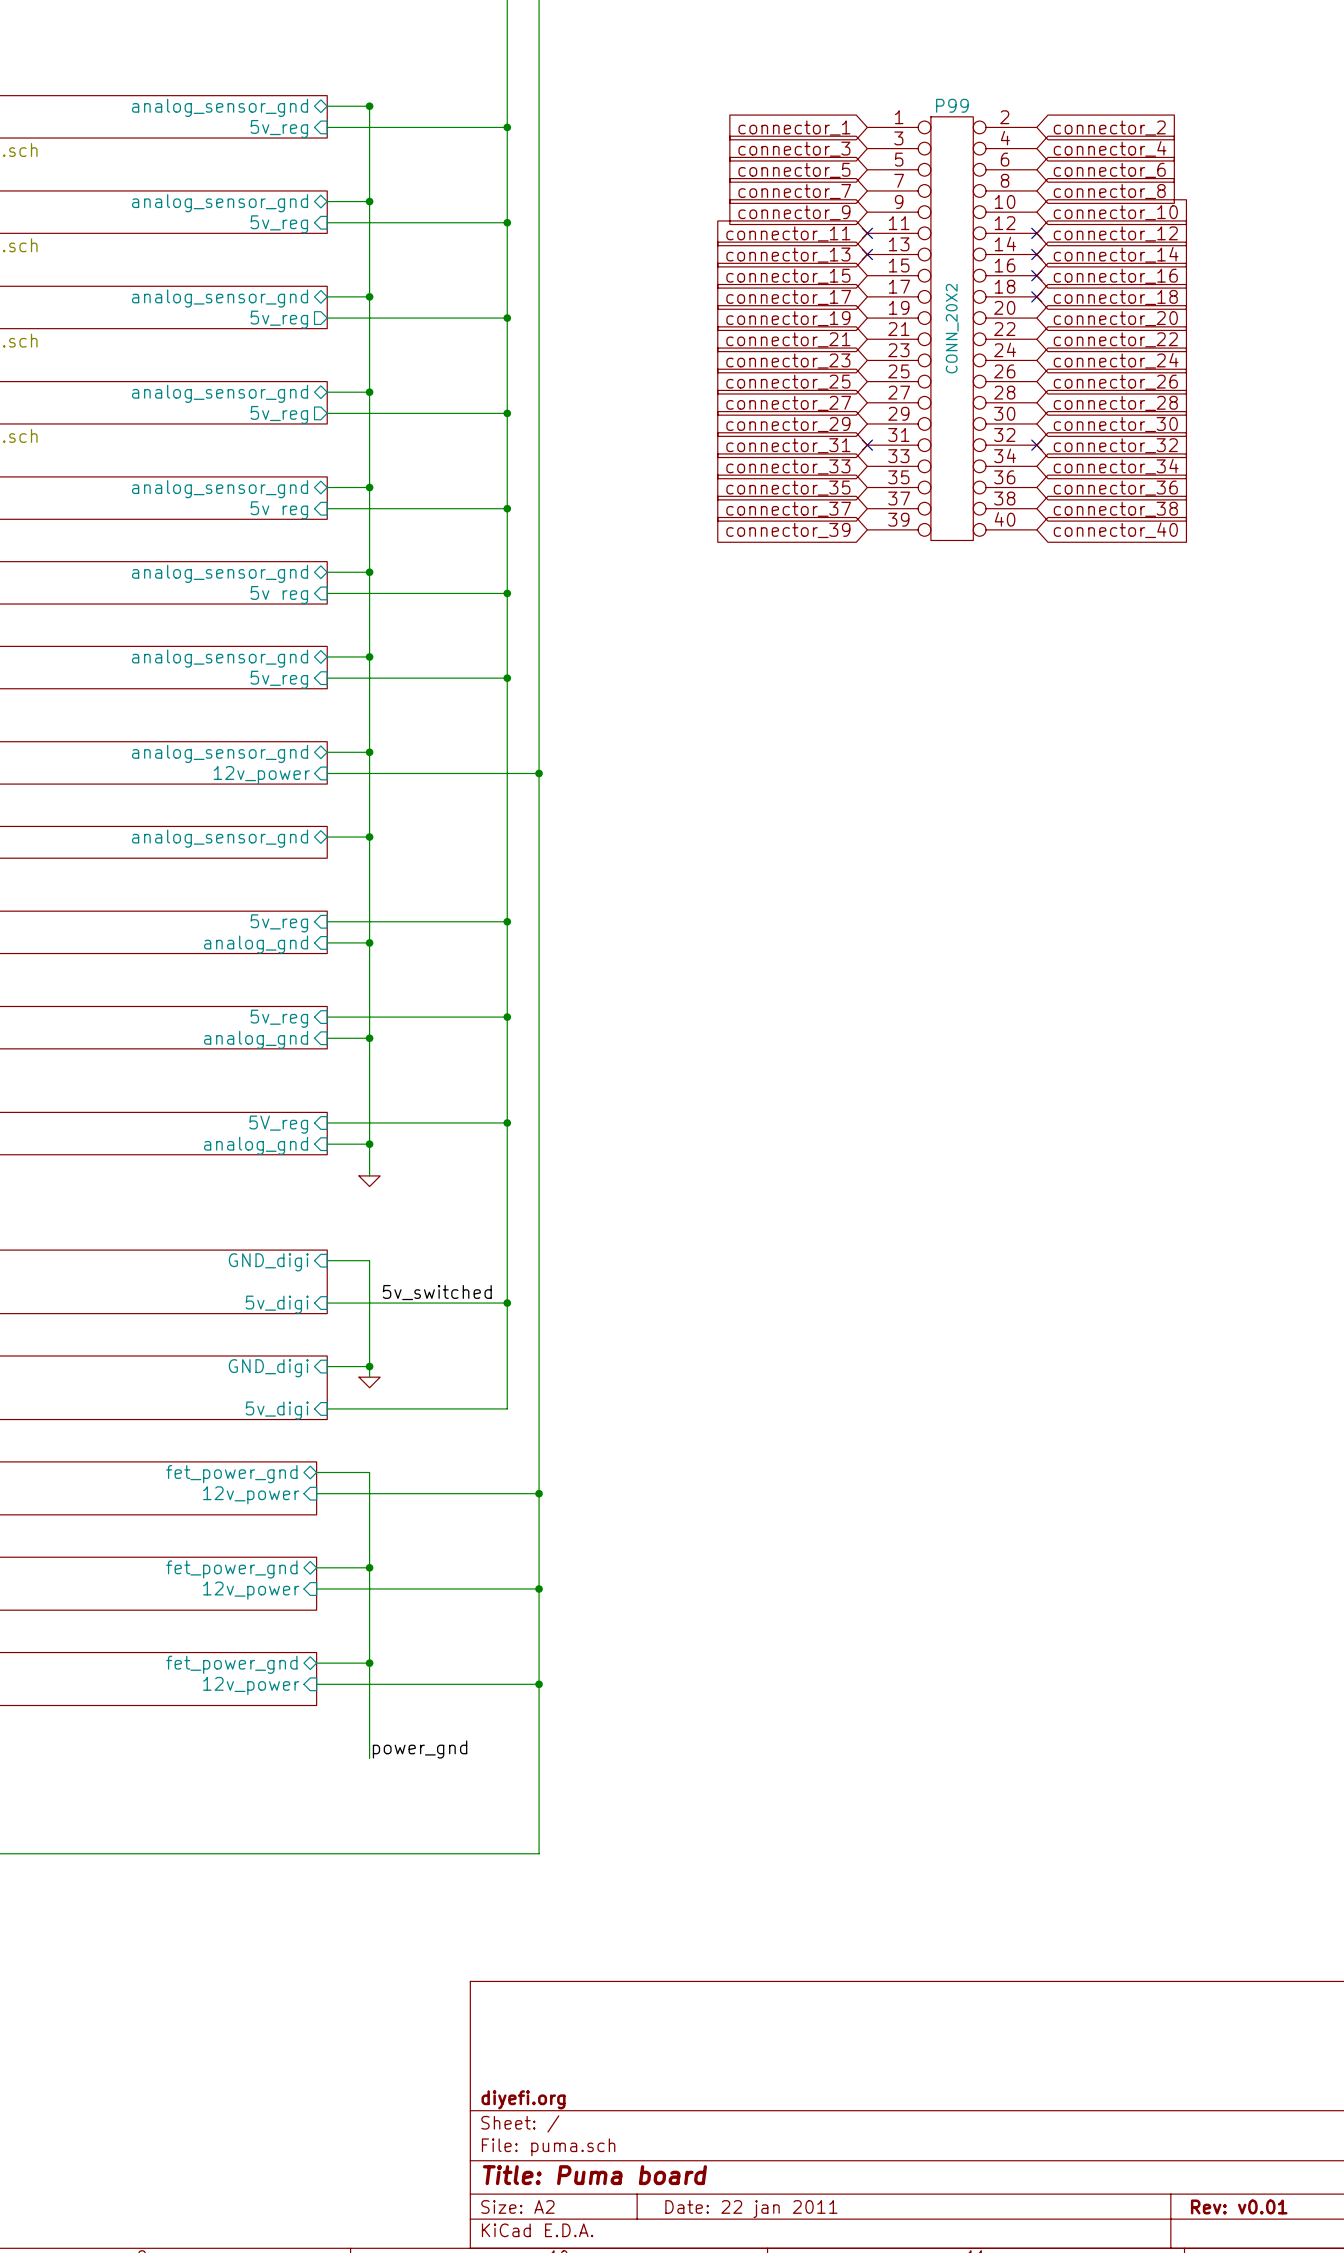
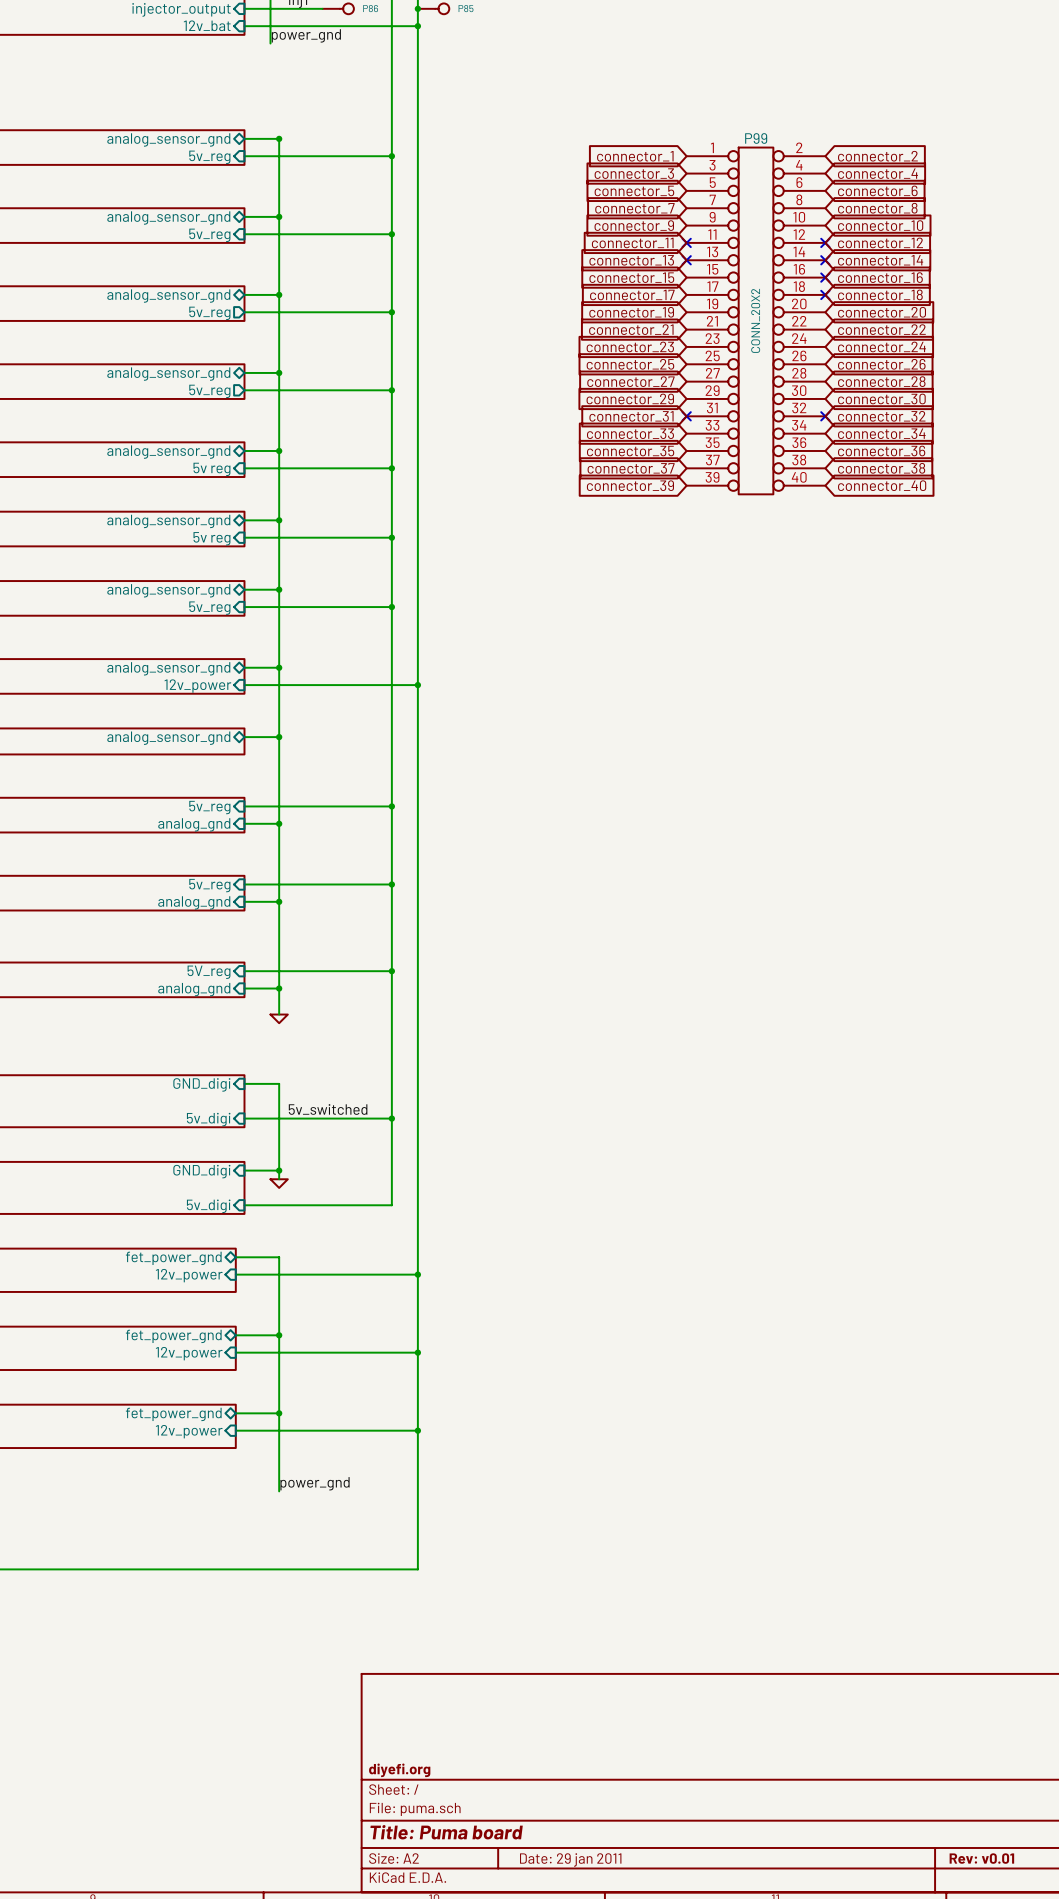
title block: Date: 22 jan 2011 (751, 2209) -> Date: 29 jan 2011 (570, 1859)

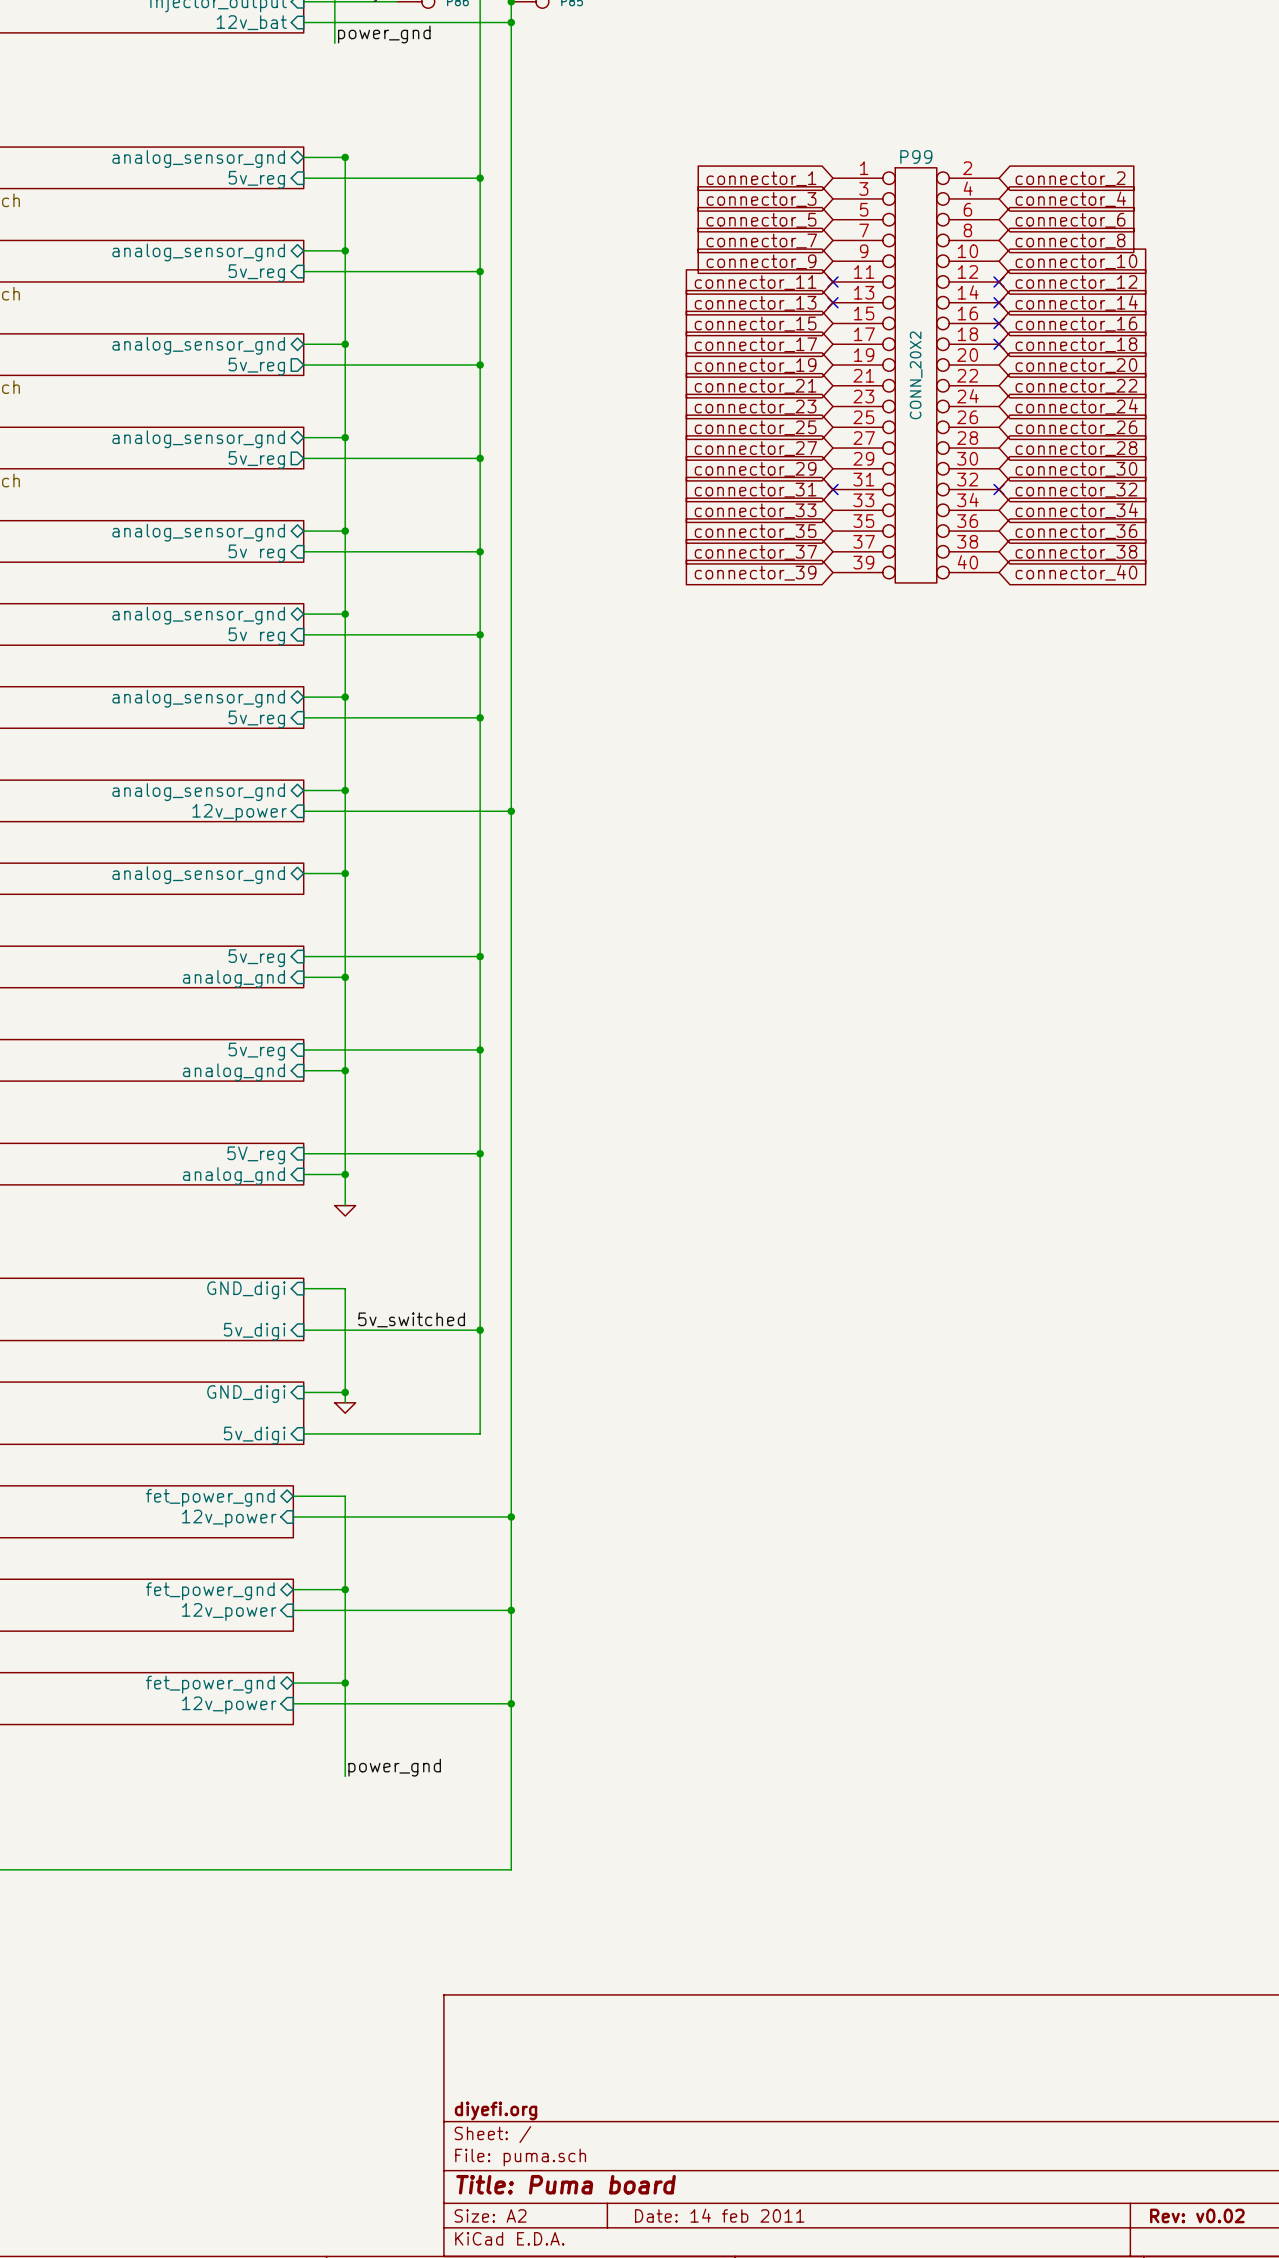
title block: Rev: v0.01 (981, 1858) -> Rev: v0.02 (1197, 2215)
title block: Date: 29 jan 2011 (570, 1859) -> Date: 14 feb 2011 (719, 2215)

